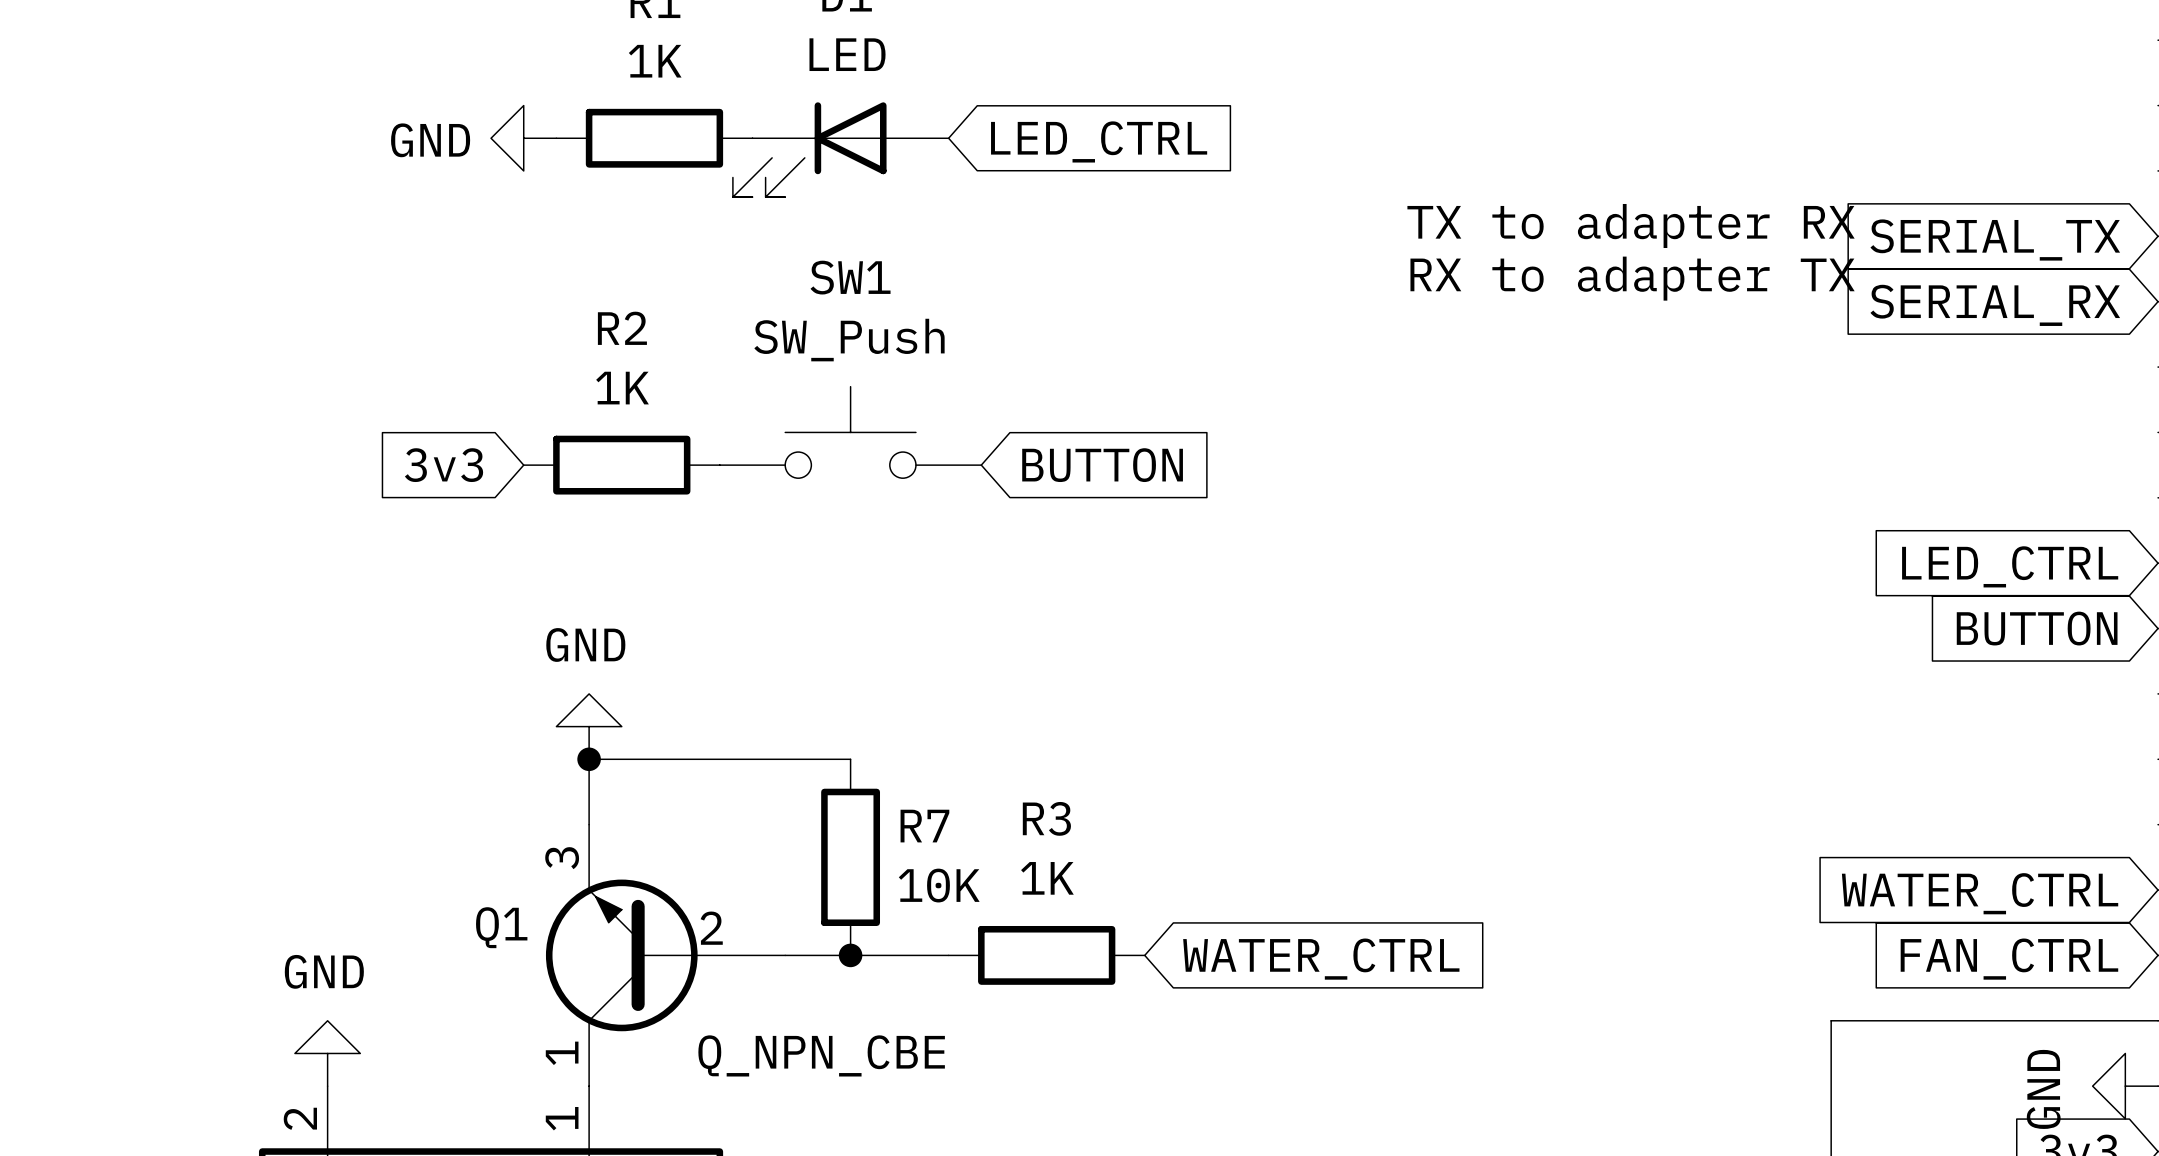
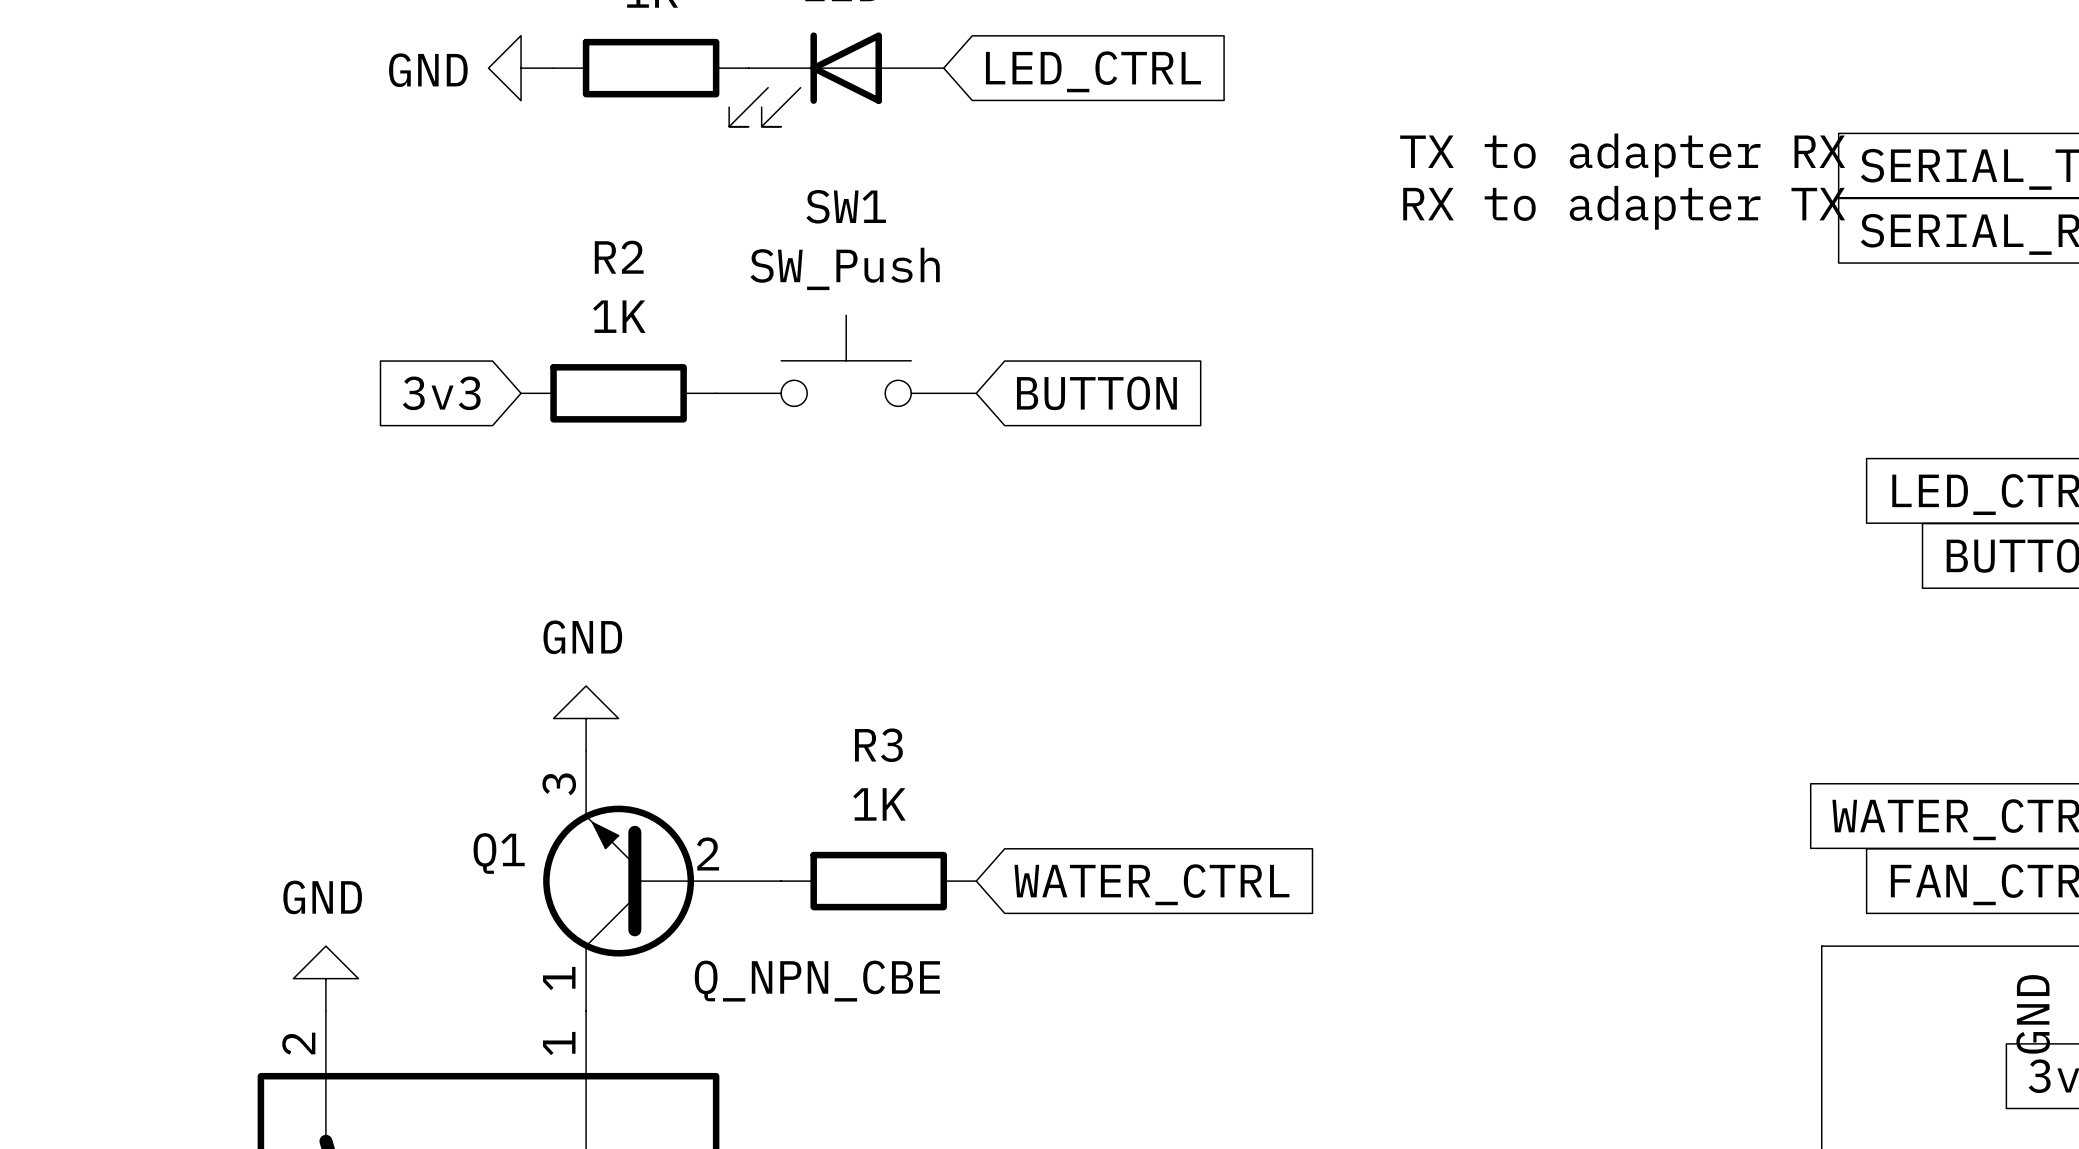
power symbol position: GND (589, 726) -> GND (586, 718)
junction: (589, 759) -> none
wire: (850, 759) (589, 759) (589, 824) -> none
R7: 10K (850, 857) -> none
wire: (785, 955) (948, 955) -> none
junction: (850, 955) -> none
R3 position: (1046, 955) -> (878, 881)
global label position: WATER_CTRL (1321, 959) -> WATER_CTRL (1151, 884)

